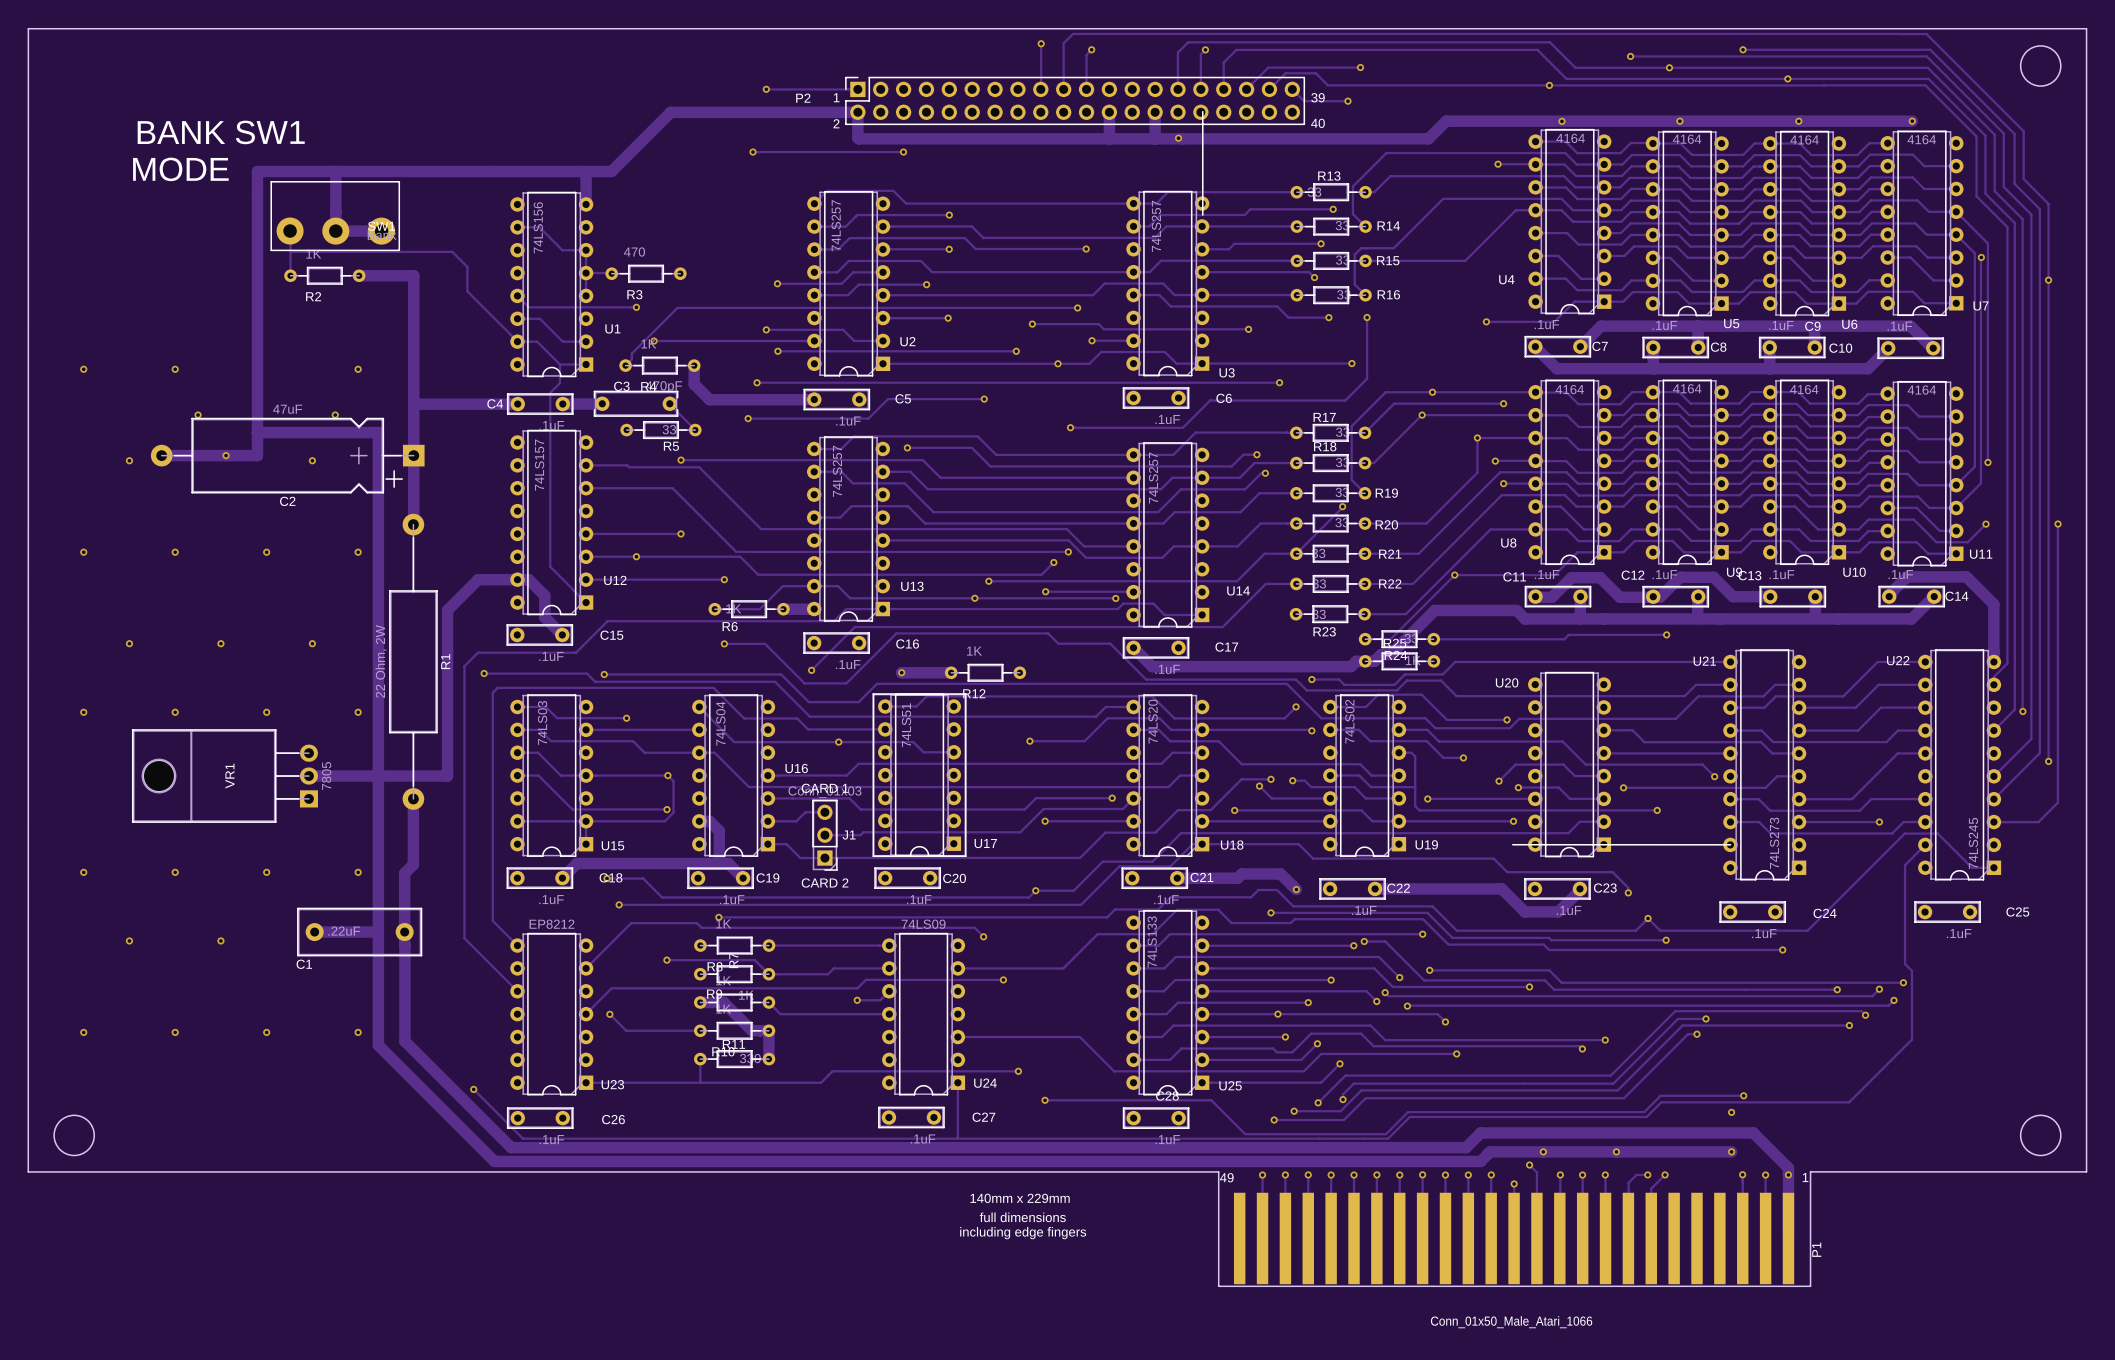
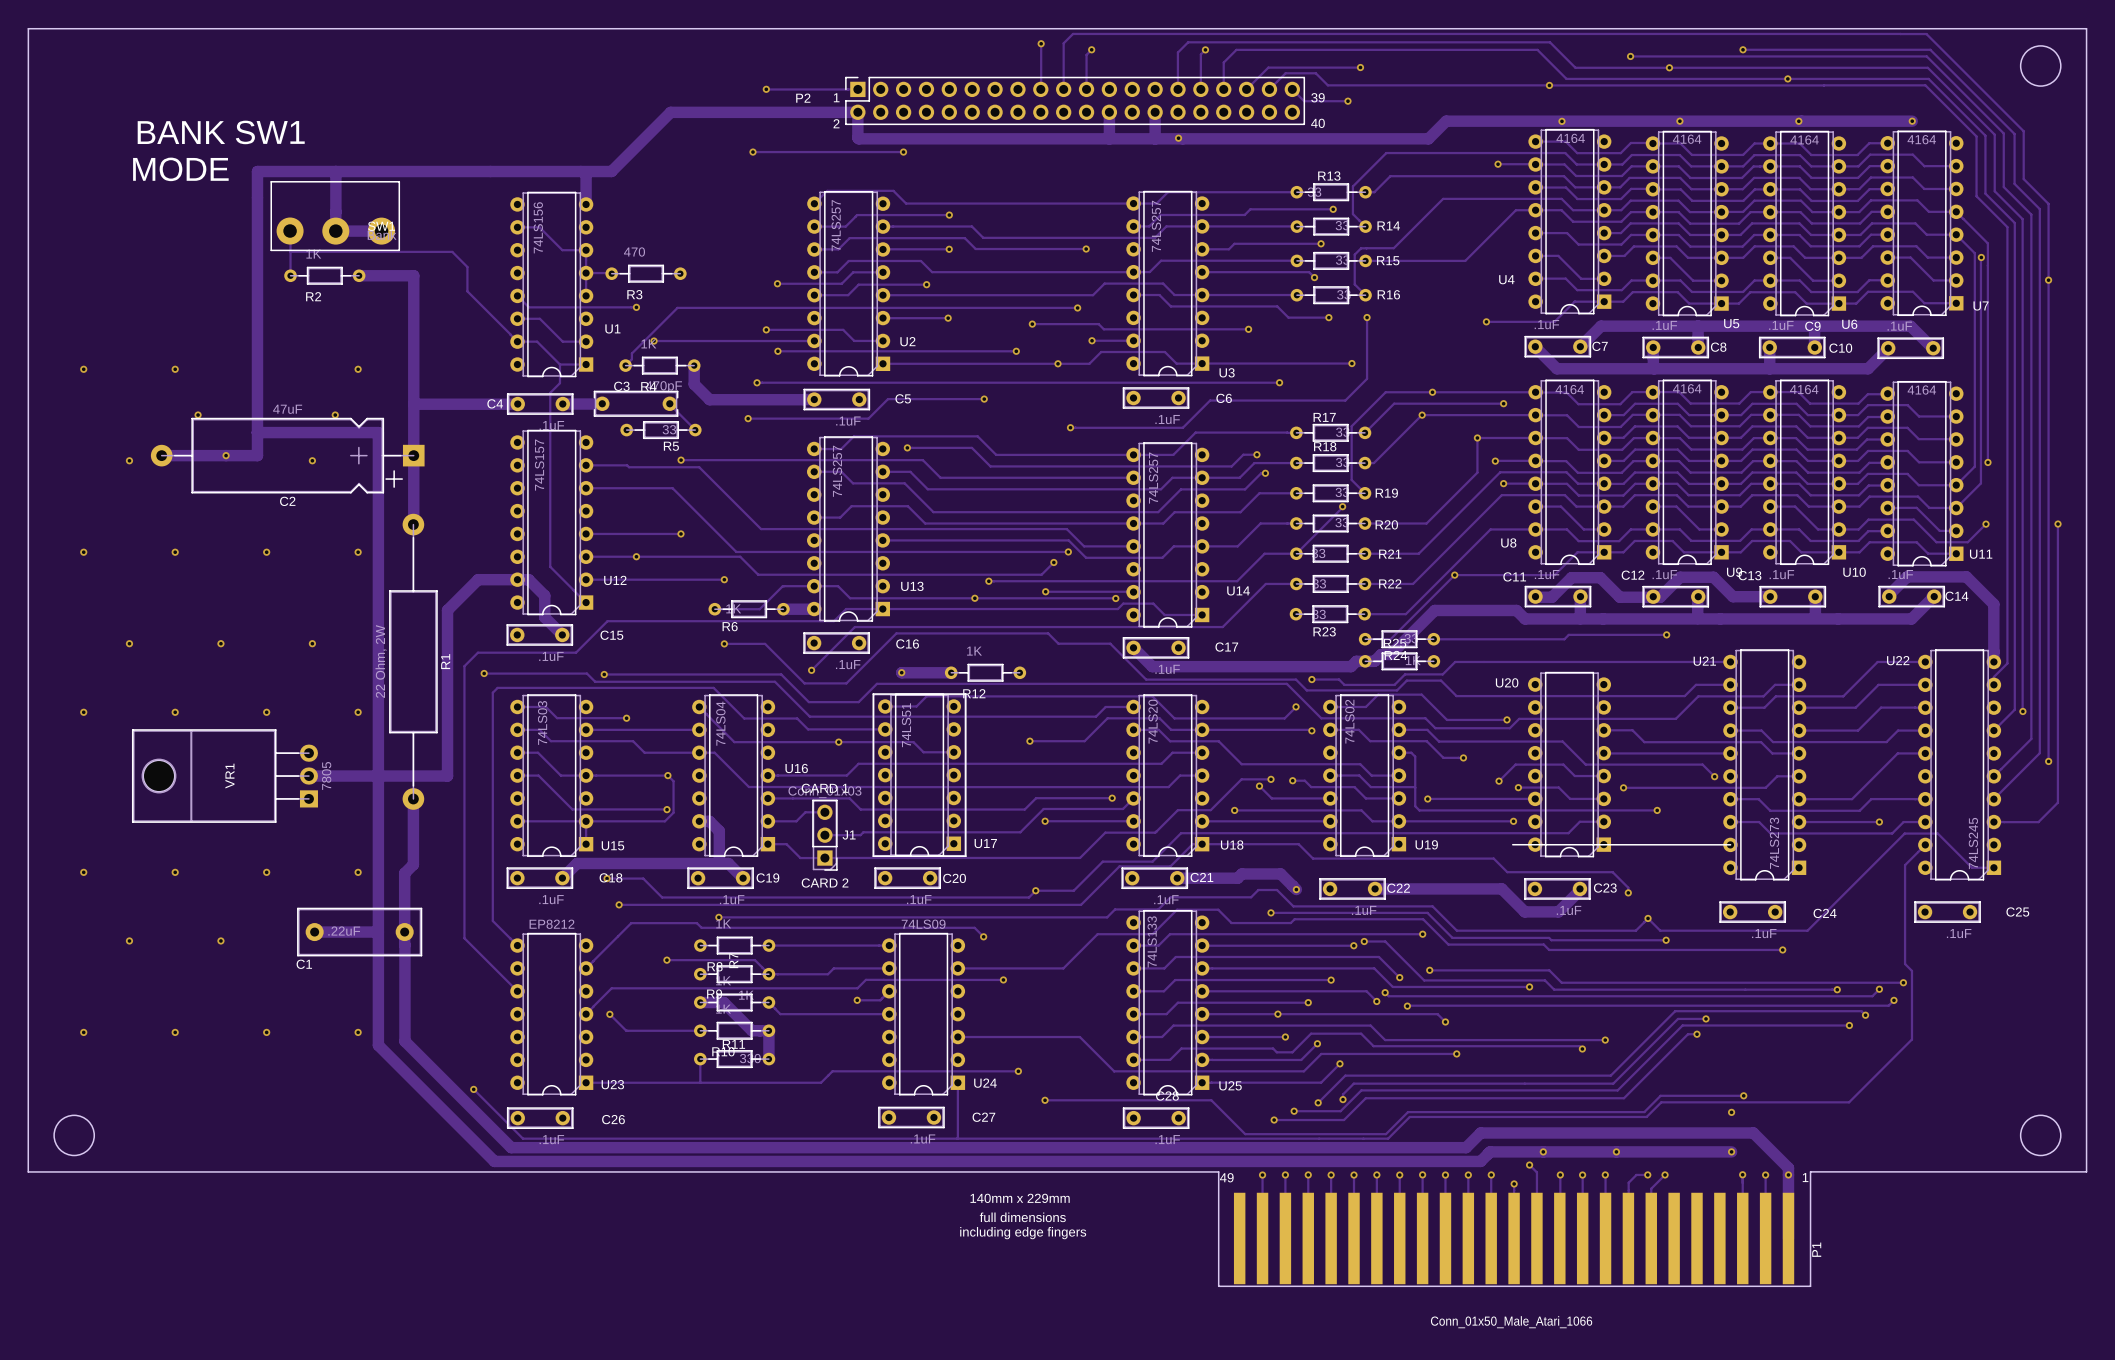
line: (1202, 111) (1202, 215) -> none

